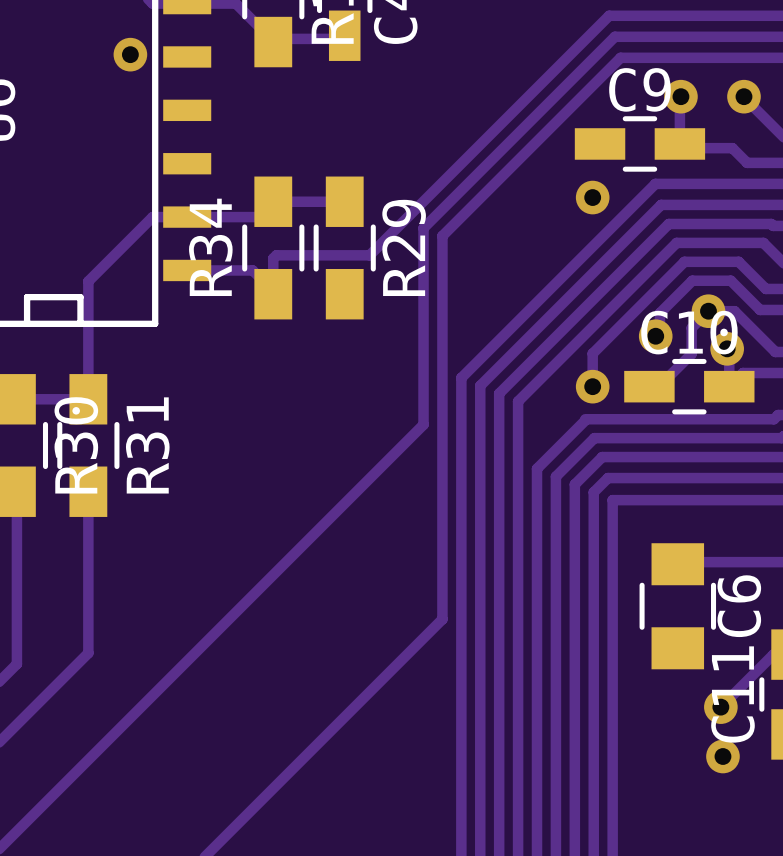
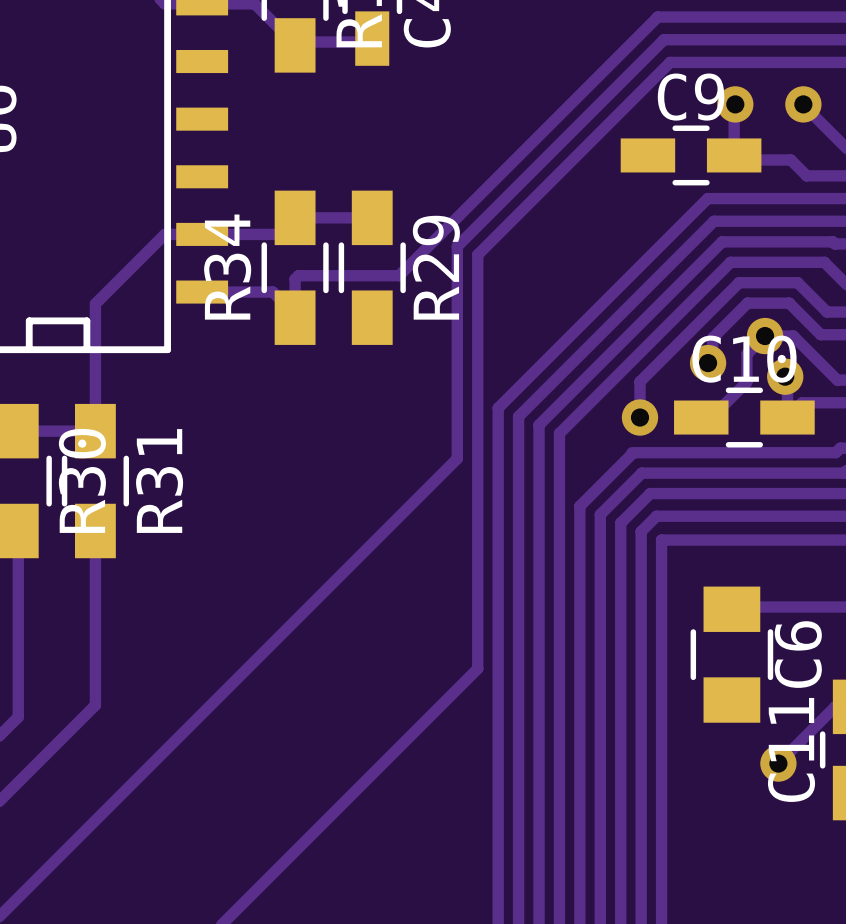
via: (130, 54) -> none
via: (592, 197) -> none
via: (722, 756) -> none

